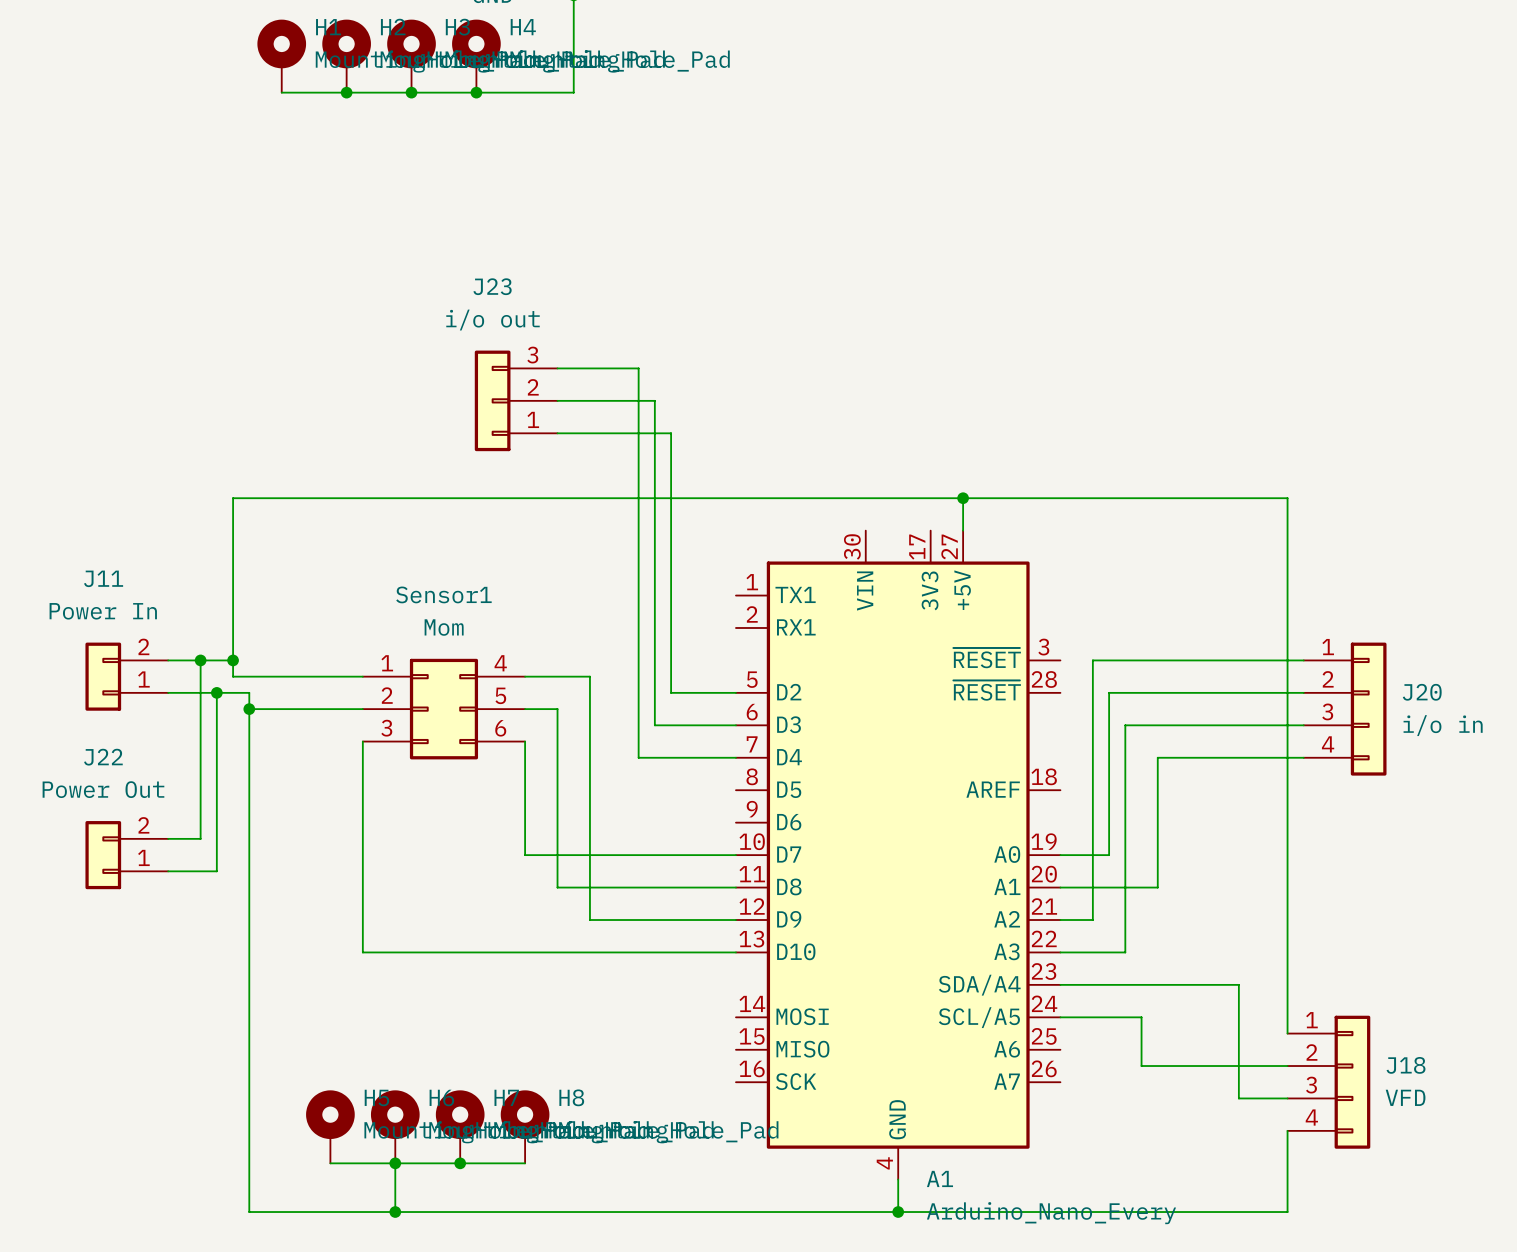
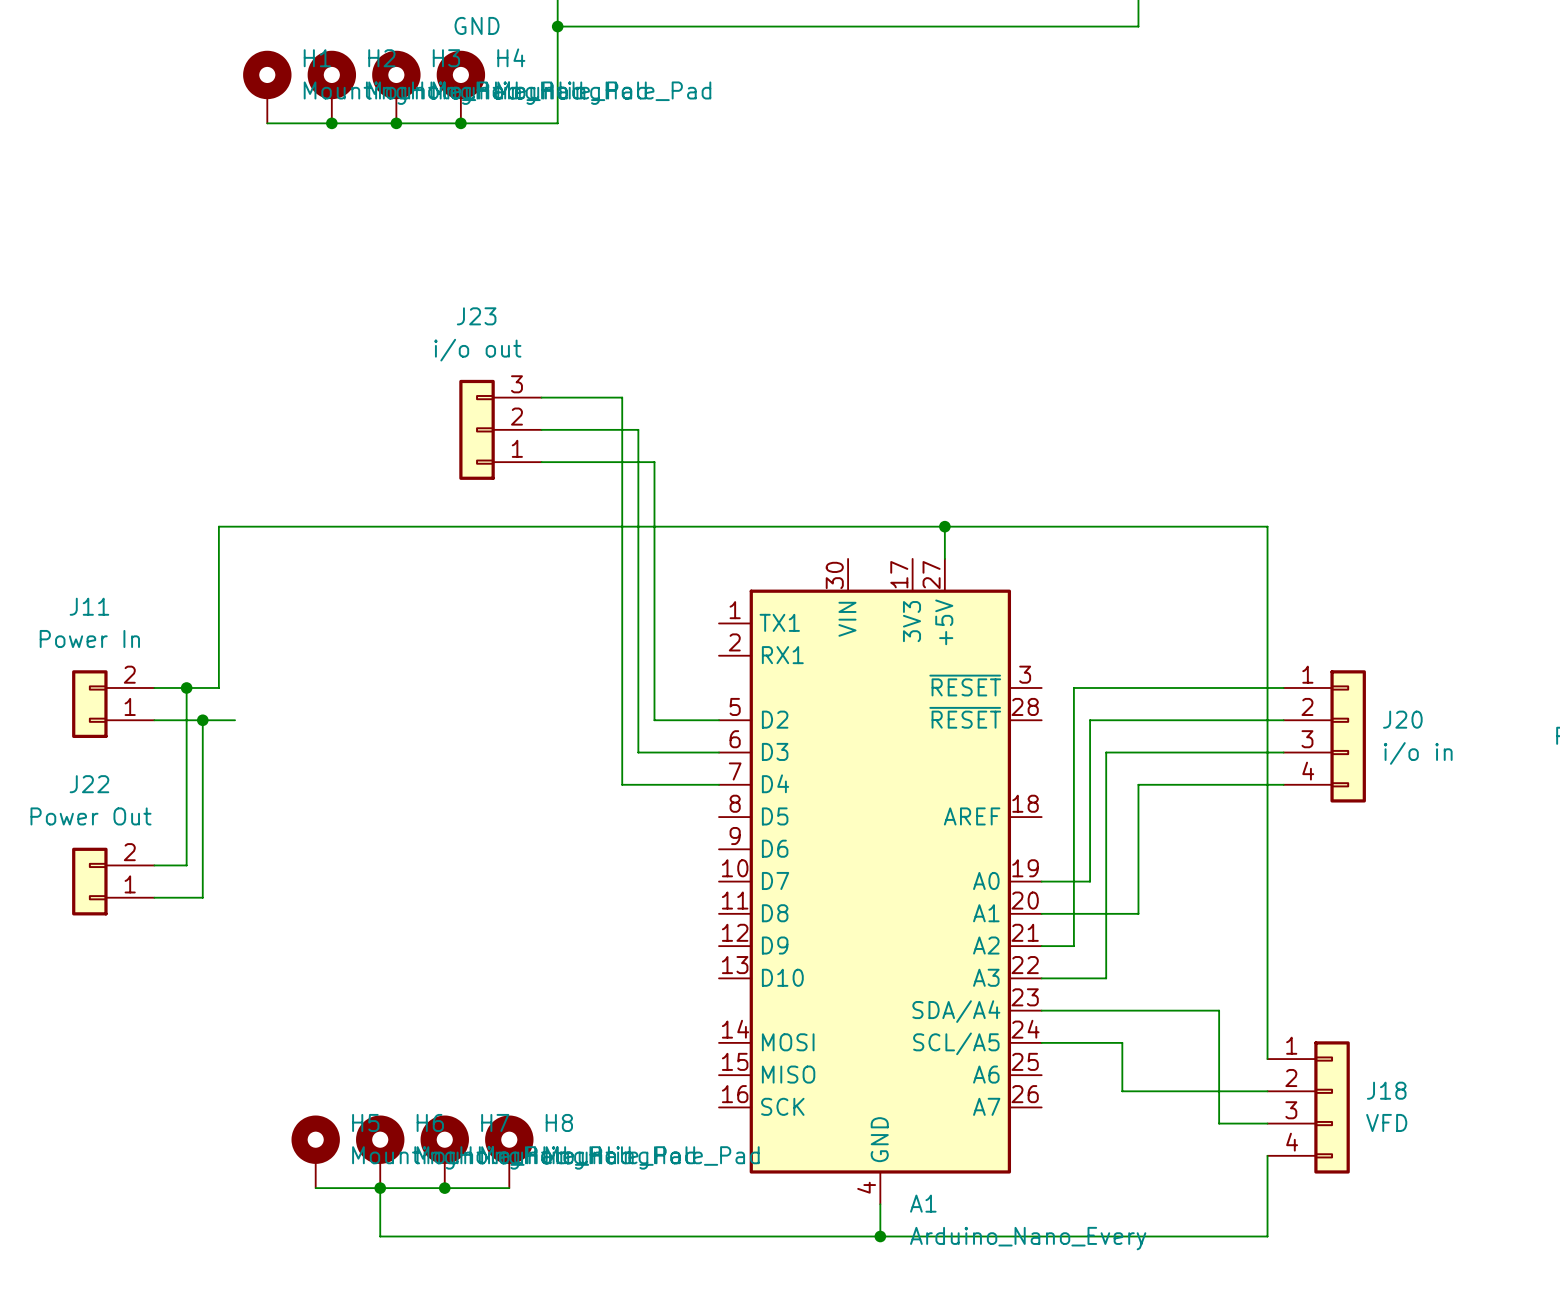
wire: (233, 660) (233, 676) (362, 676) -> none
junction: (233, 660) -> none
wire: (525, 676) (589, 676) (589, 920) (735, 920) -> none
wire: (249, 692) (249, 1212) (395, 1212) -> none
wire: (249, 709) (362, 709) -> none
junction: (249, 709) -> none
Sensor1: Mom (443, 709) -> none
wire: (525, 709) (557, 709) (557, 887) (735, 887) -> none
wire: (362, 741) (362, 952) (735, 952) -> none
wire: (525, 741) (525, 855) (735, 855) -> none
junction: (395, 1212) -> none

